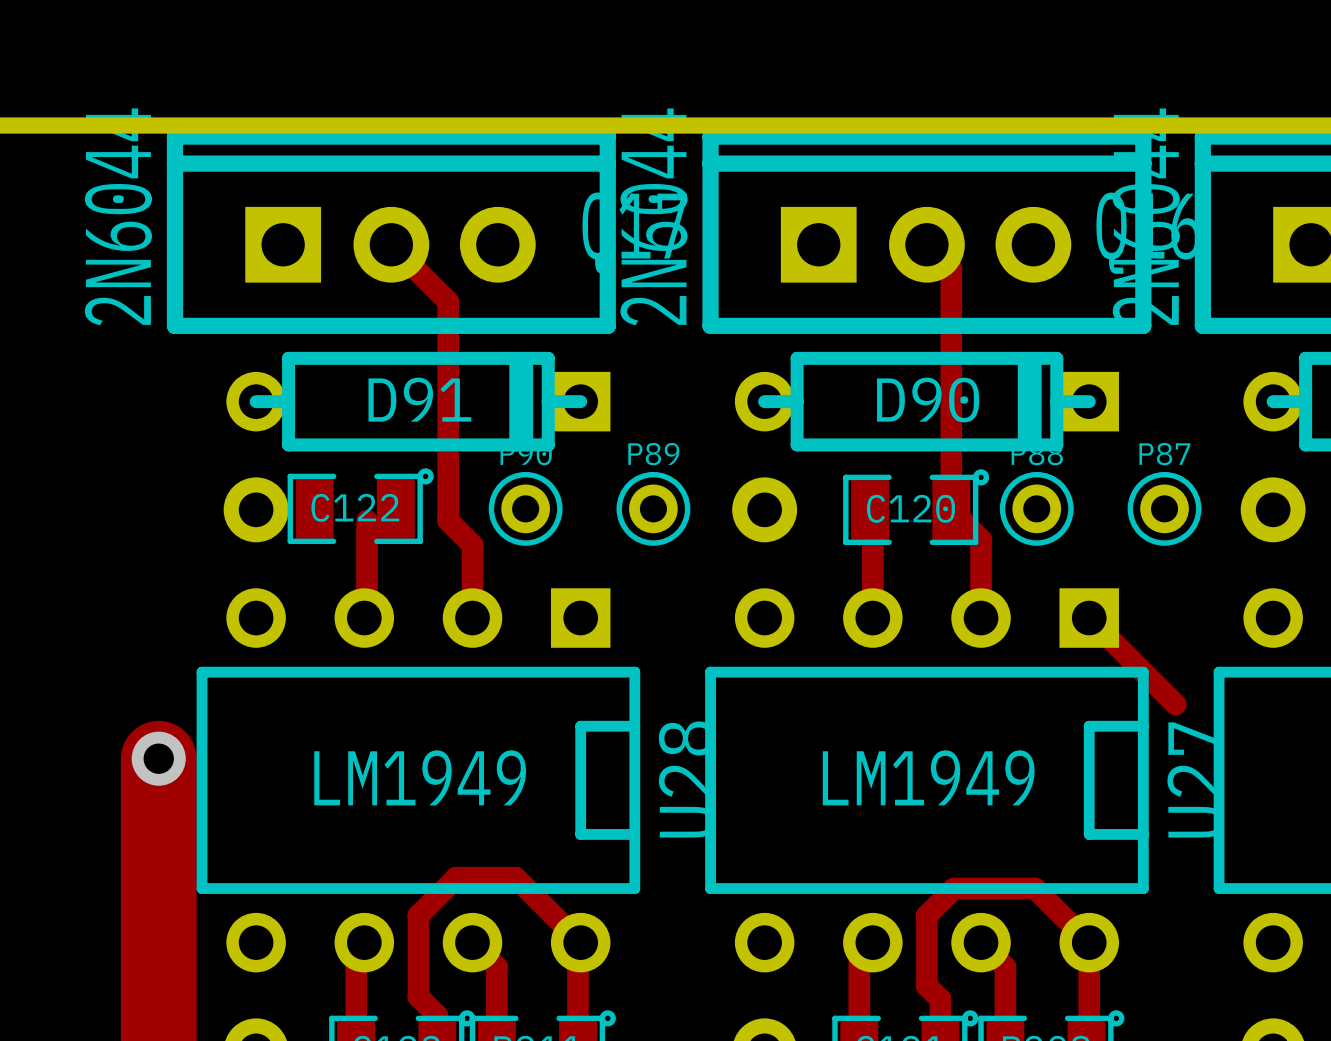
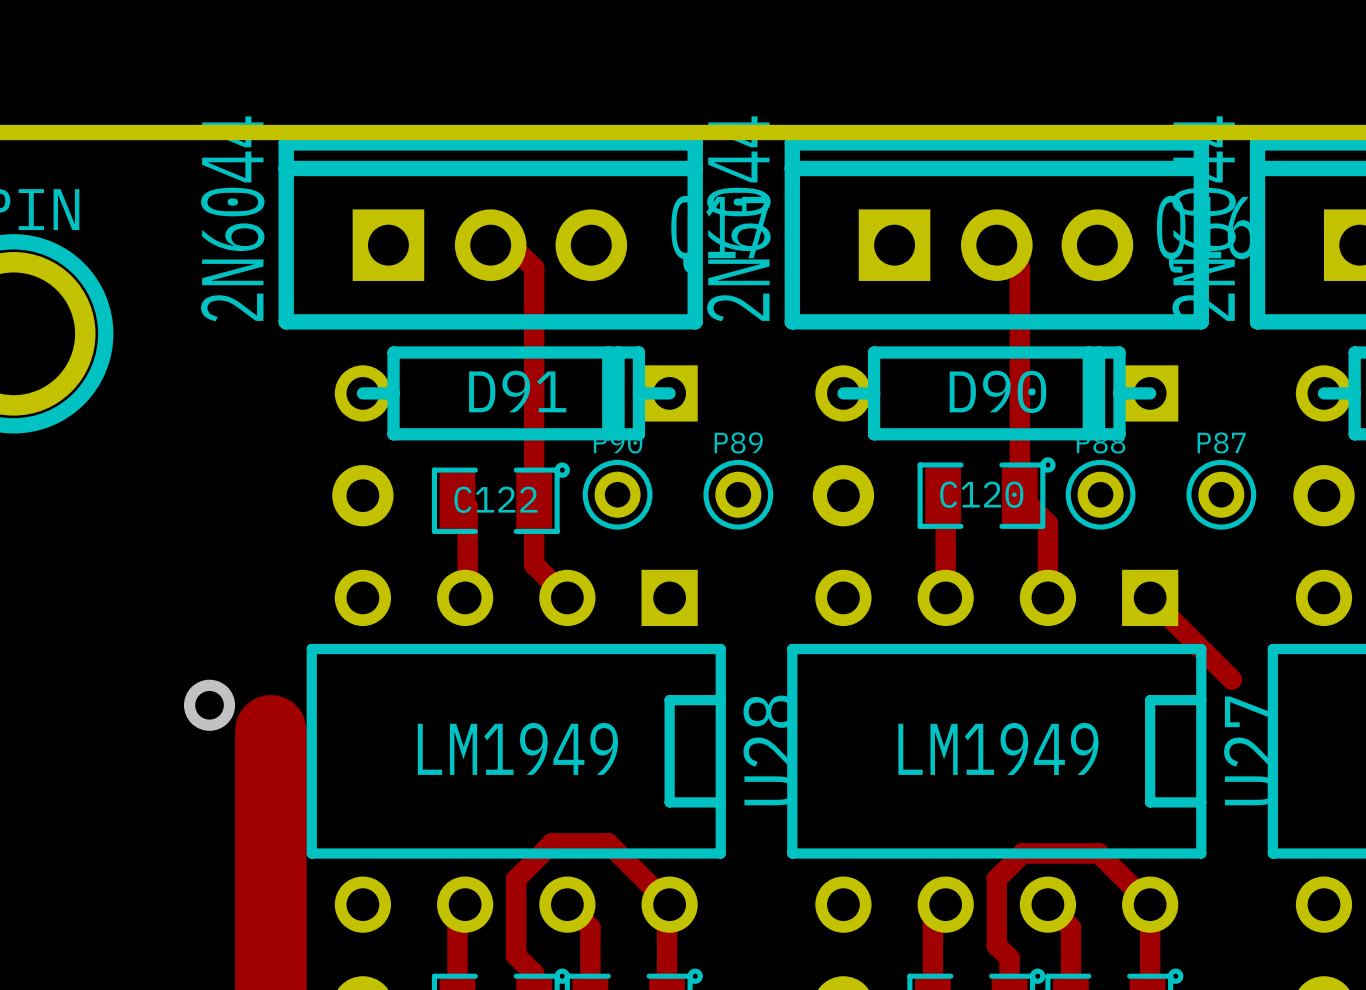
track: (391, 244) (448, 301) (448, 520) (472, 545) (472, 618) -> (516, 250) (534, 268) (534, 564) (567, 597)
C122 position: (360, 506) -> (500, 498)
via position: (158, 758) -> (209, 705)

